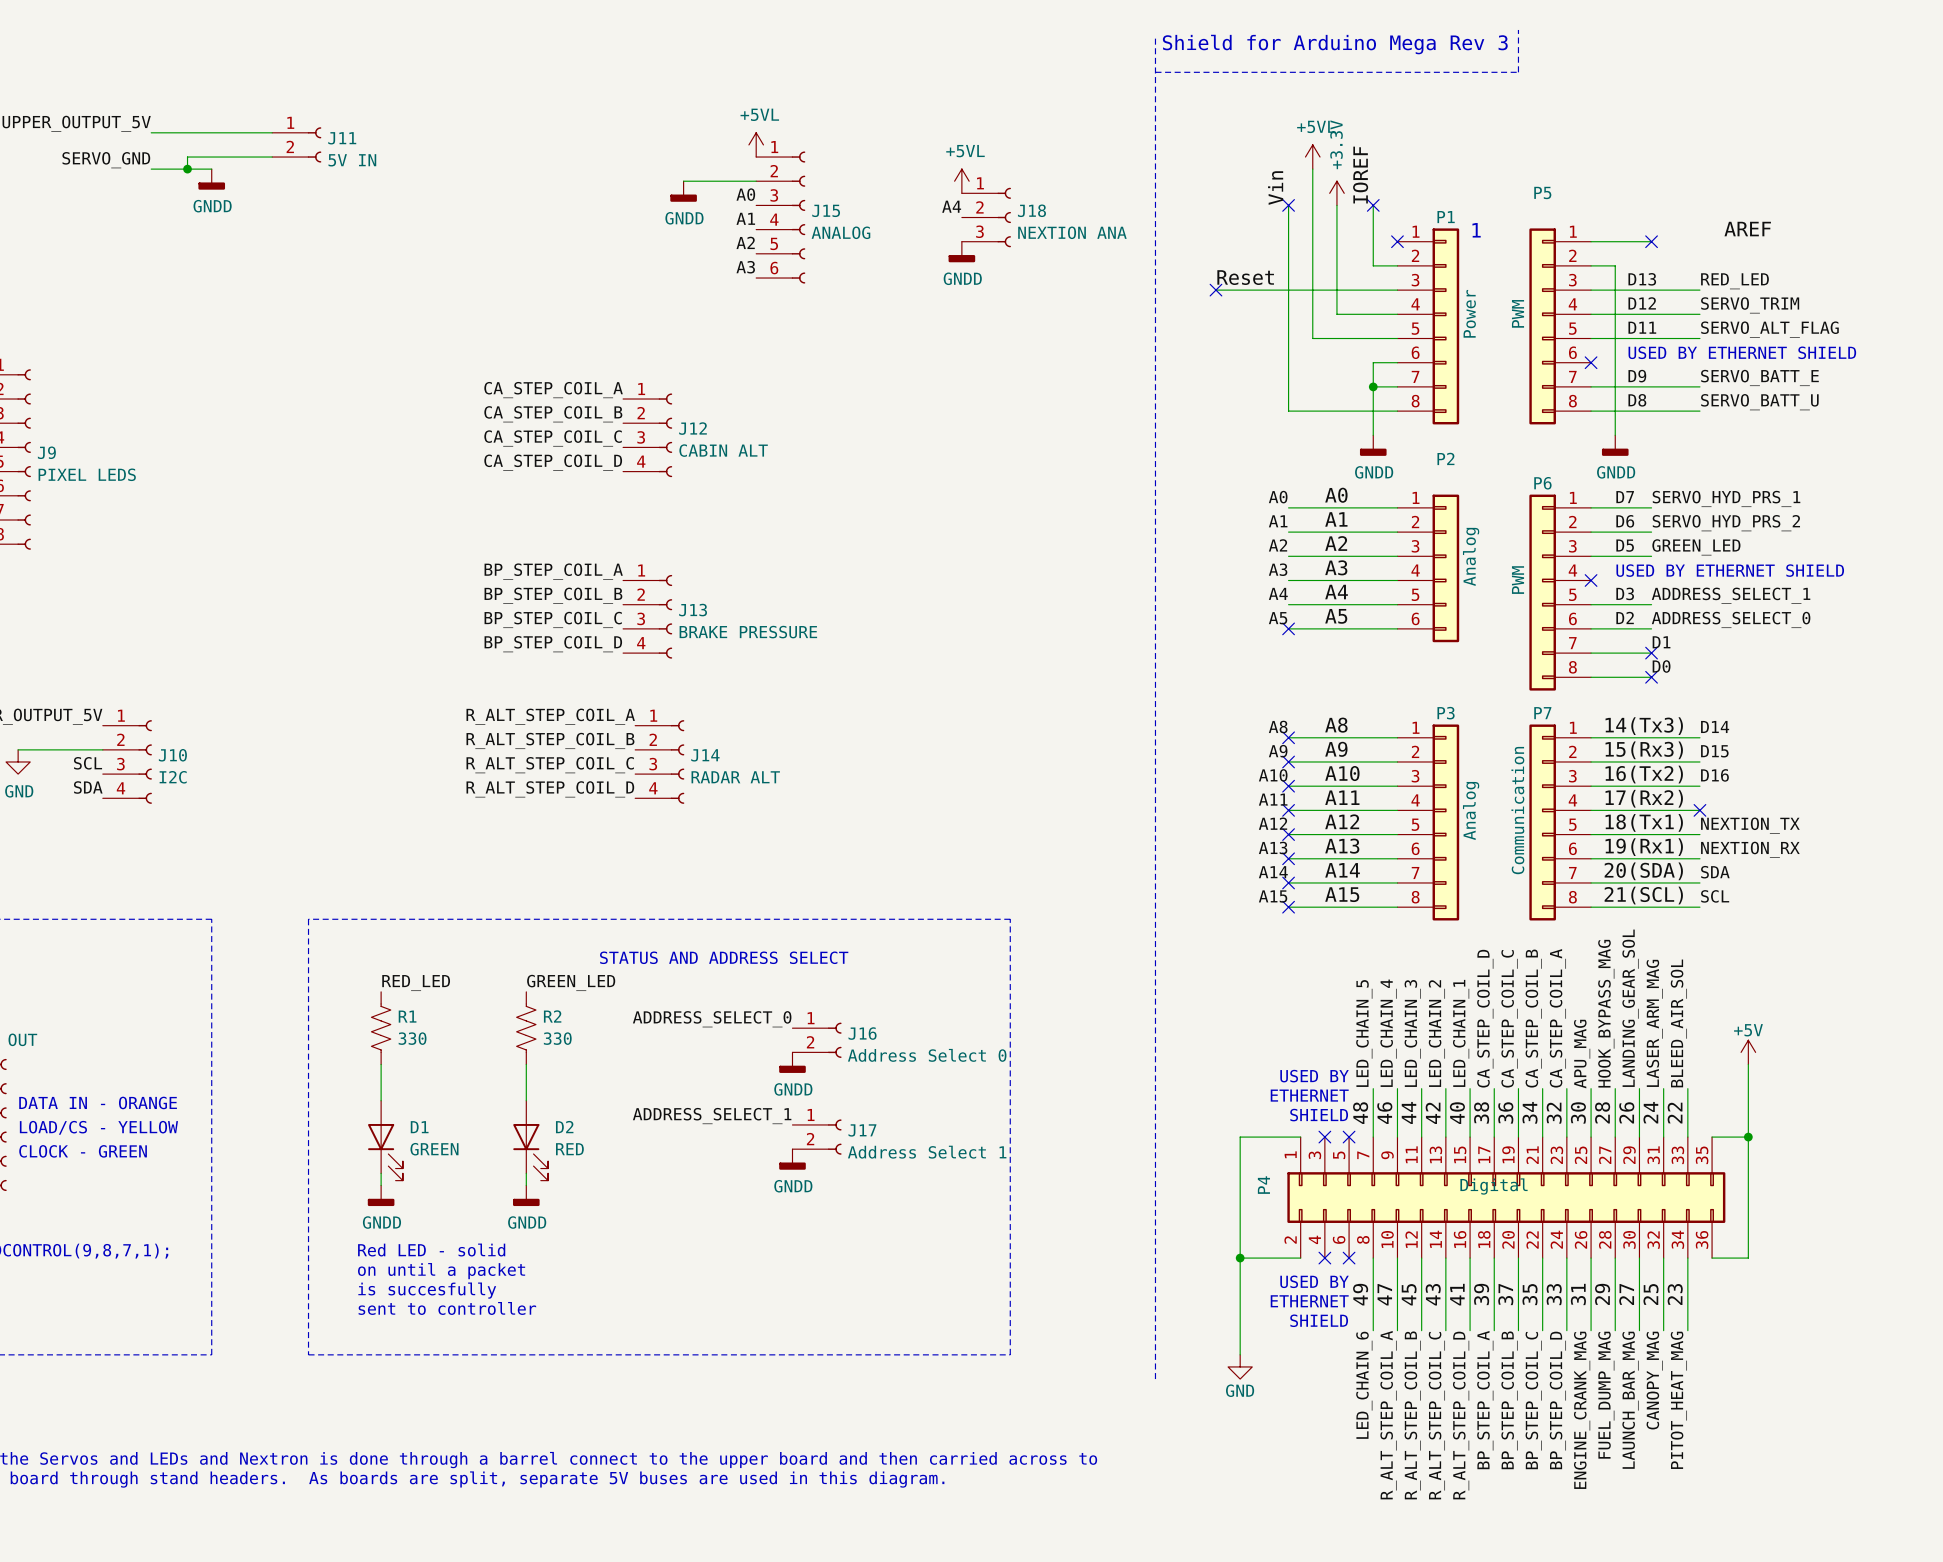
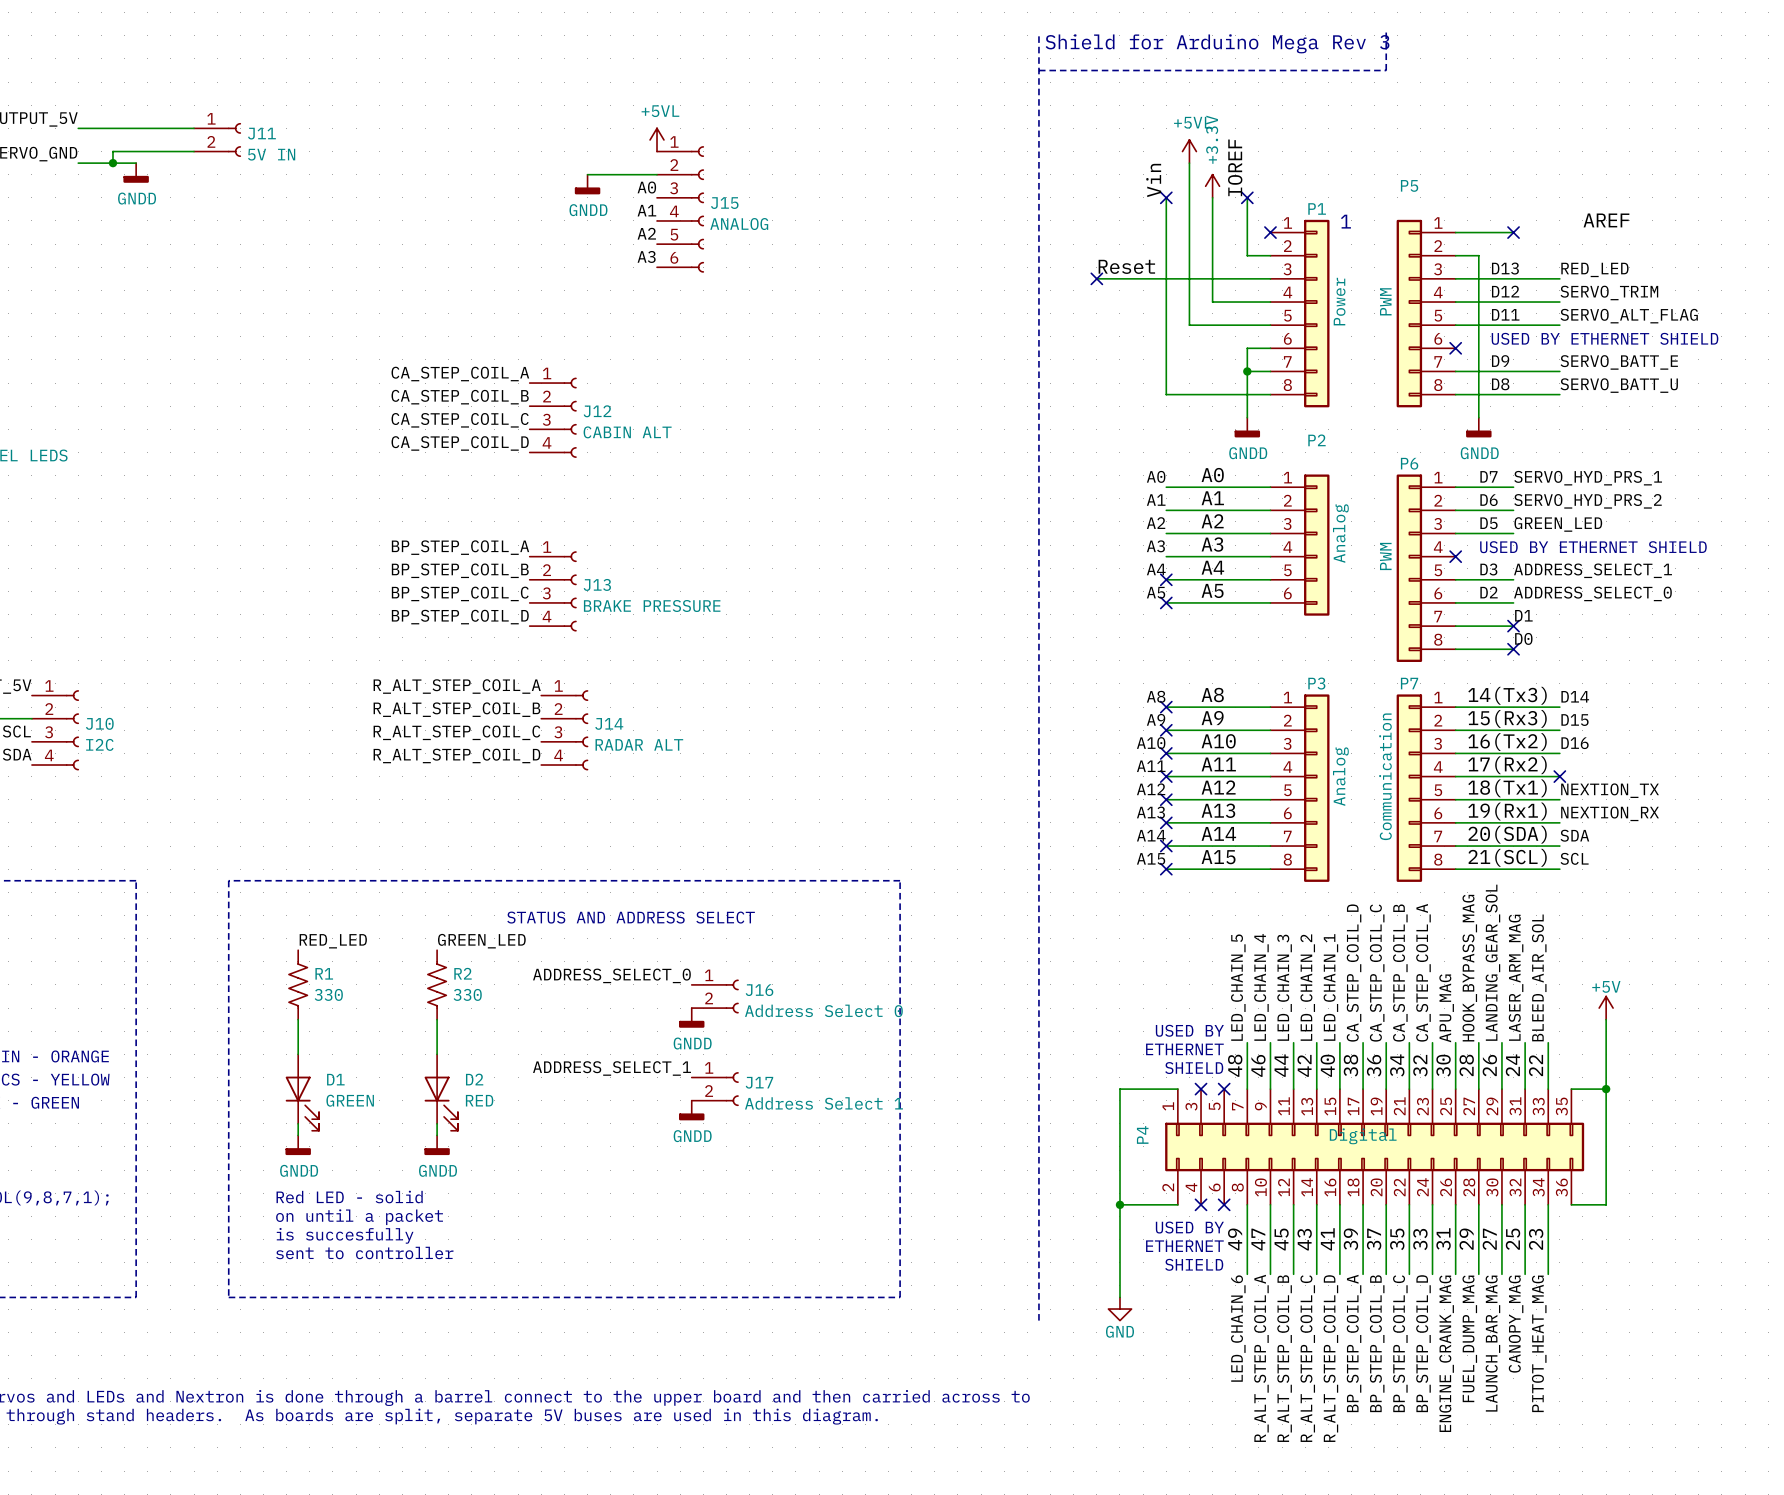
power symbol: +5VL (961, 181) -> none
label: A4 (951, 206) -> none
J18: NEXTION ANA (986, 217) -> none
power symbol: GNDD (961, 251) -> none
no-connect mark: none -> (1166, 579)

